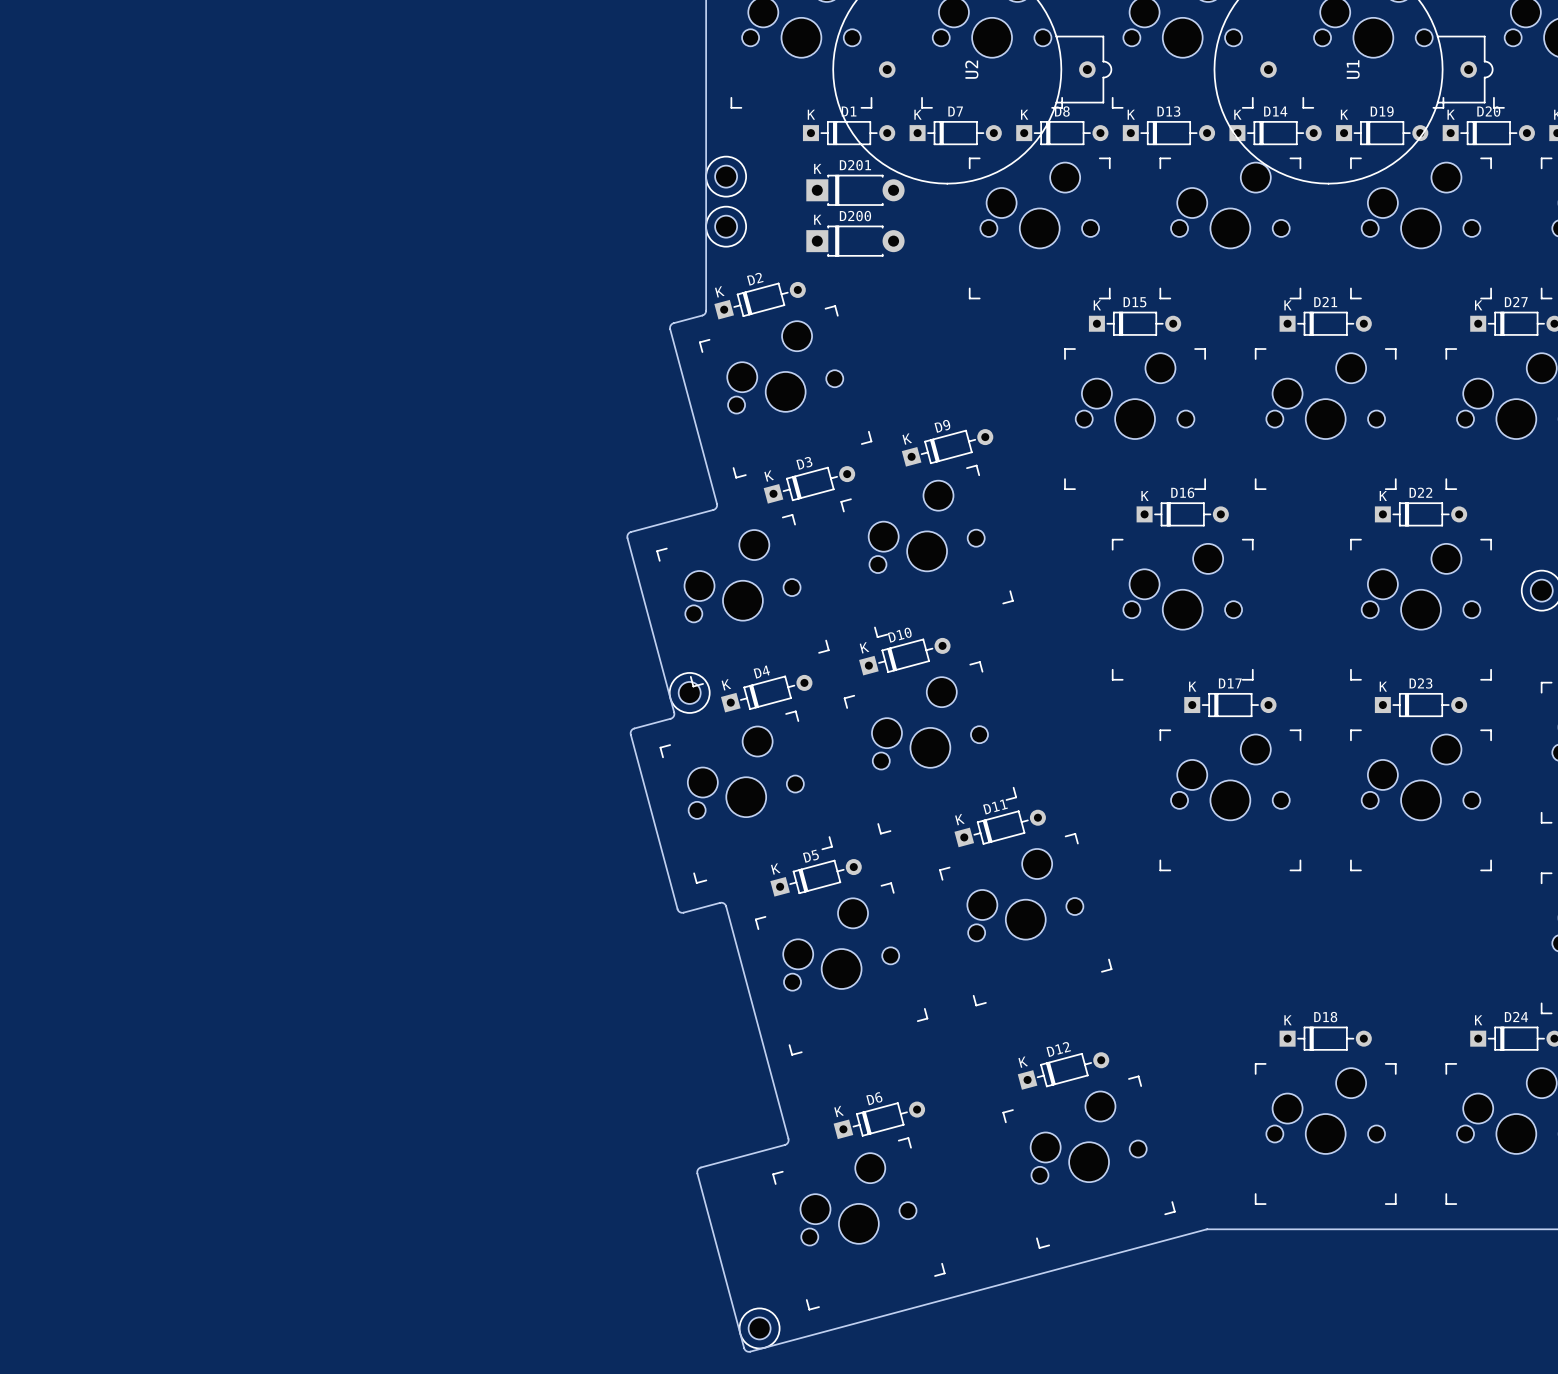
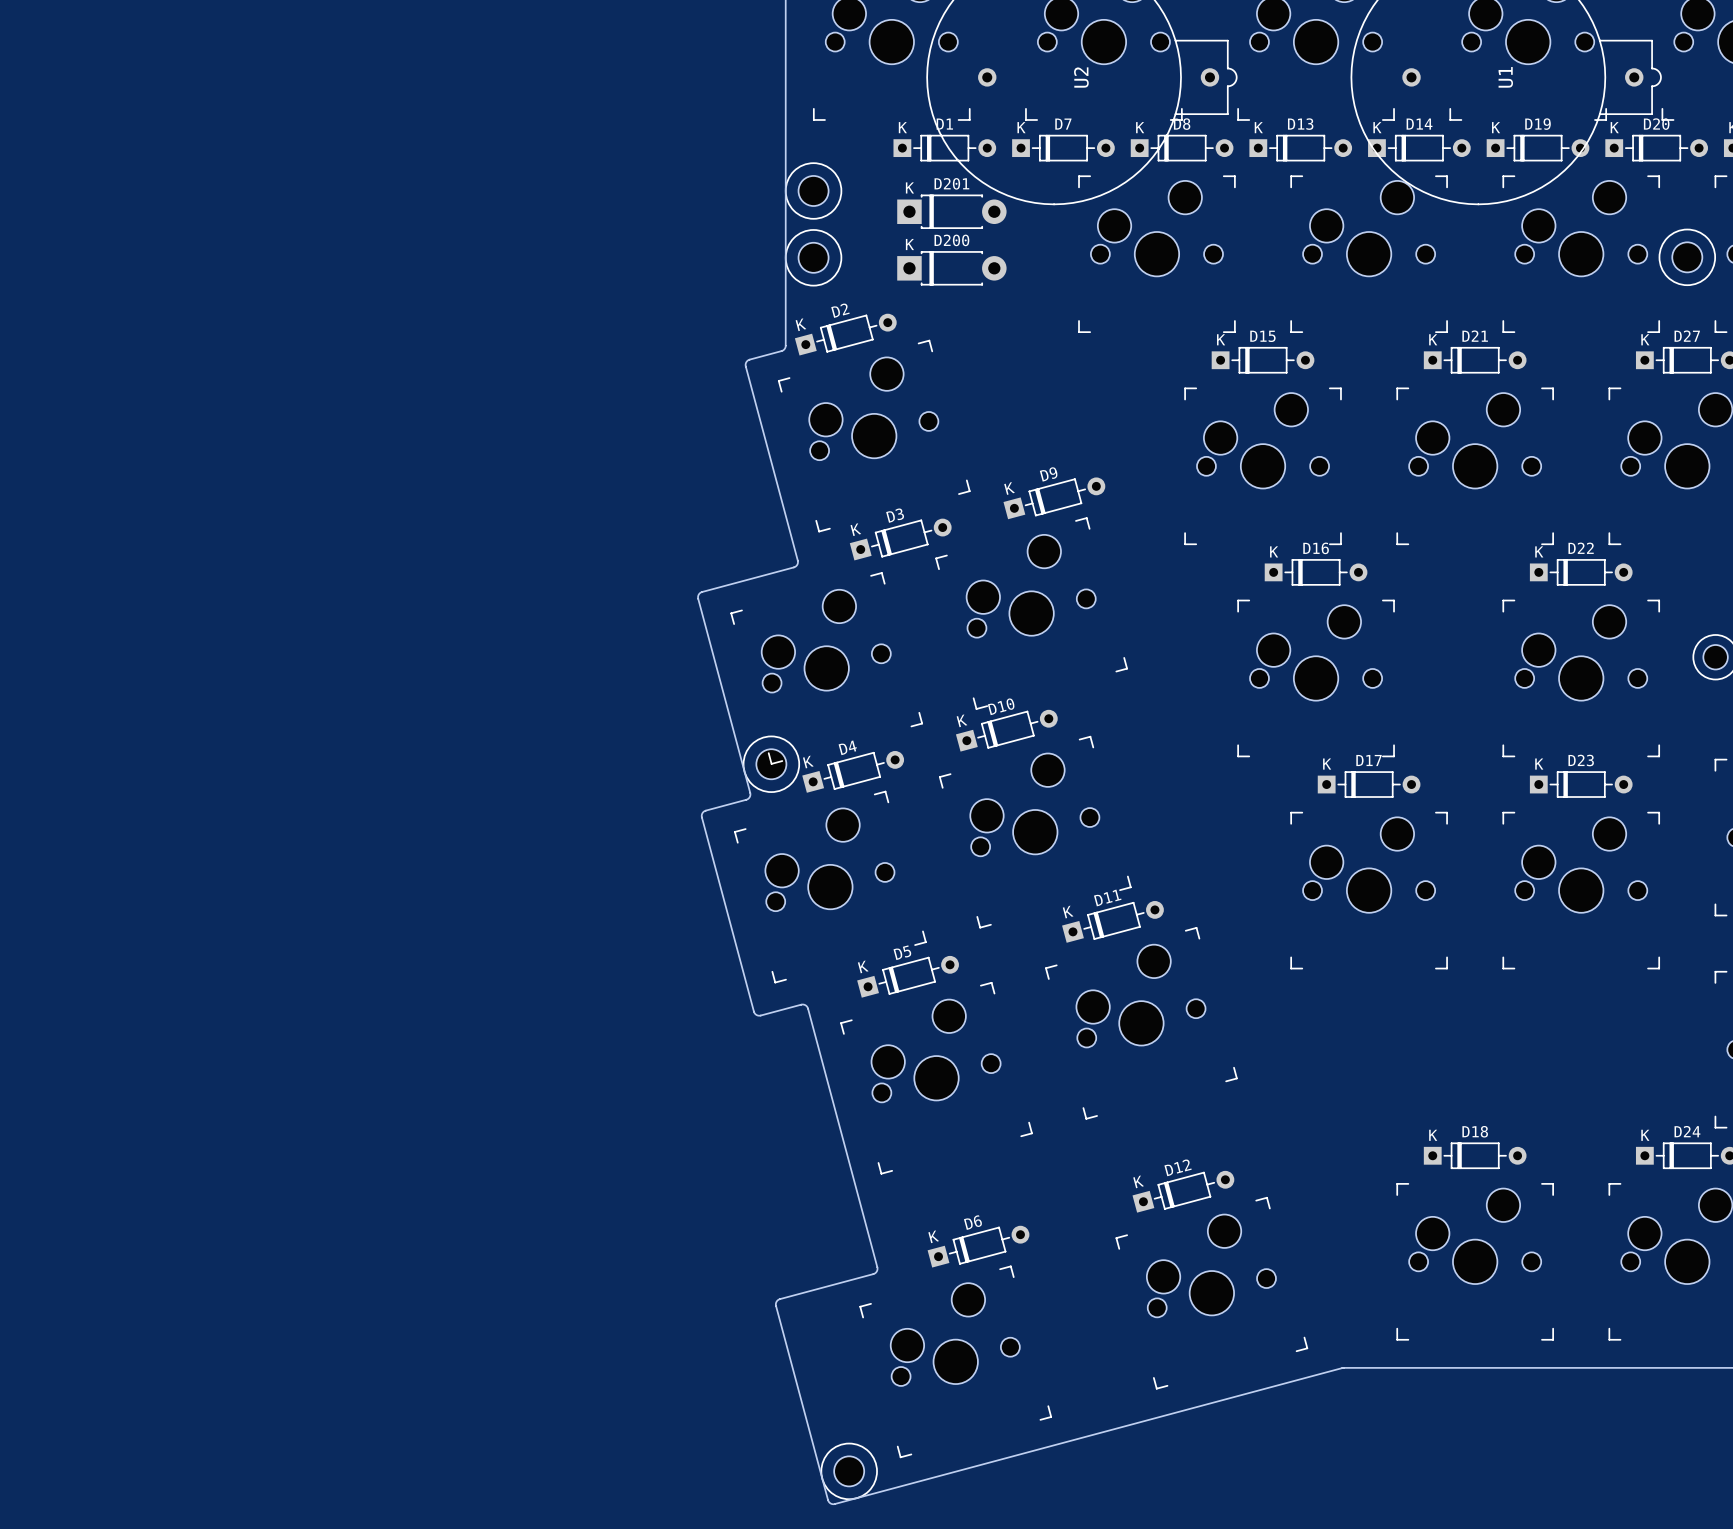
part footprint: [705, 156, 747, 198] -> [785, 162, 842, 220]
part footprint: [705, 206, 747, 248] -> [785, 229, 842, 287]
part: none -> (1687, 257)
part footprint: [669, 672, 711, 714] -> [742, 735, 800, 793]
part footprint: [739, 1307, 781, 1349] -> [820, 1442, 878, 1500]

